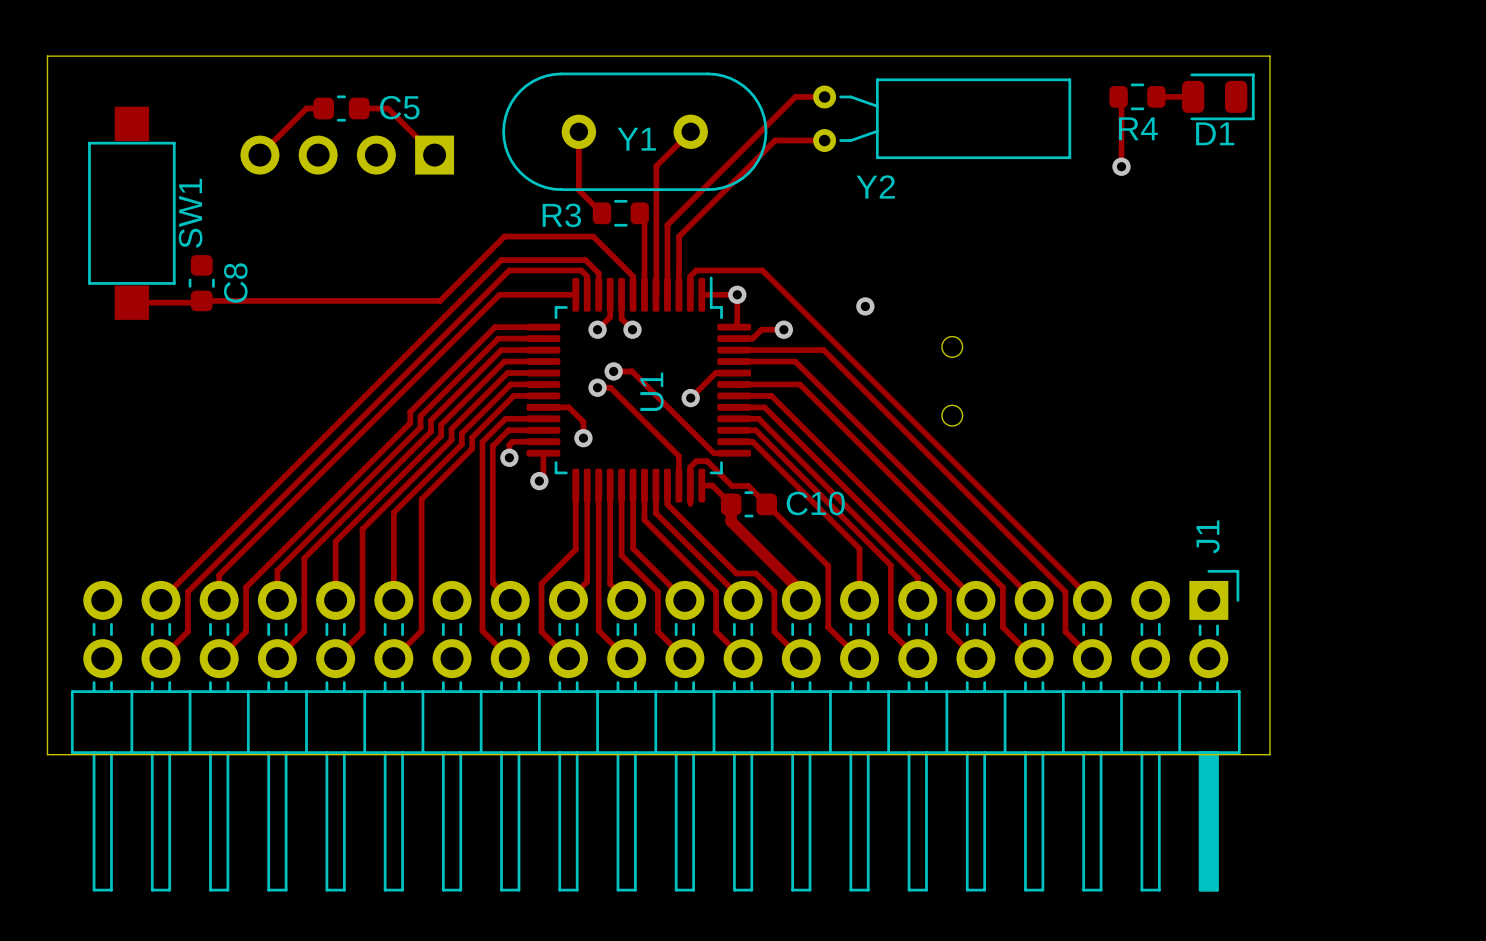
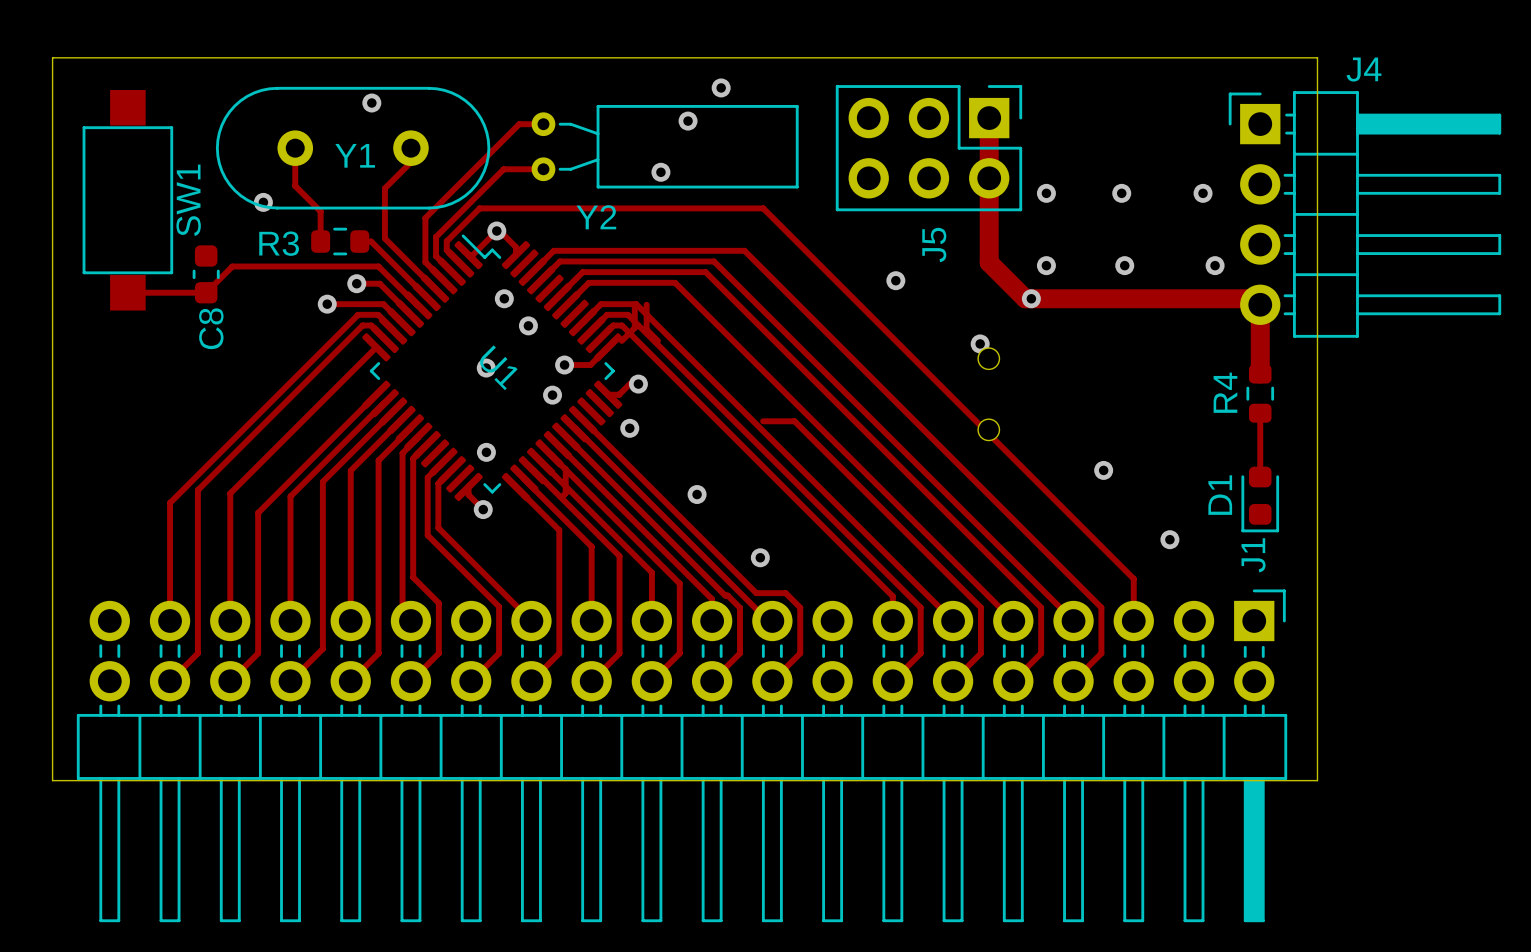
D1 footprint: [1181, 73, 1255, 121] -> [1241, 466, 1280, 533]
via: none -> (721, 87)
track: (824, 96) (795, 96) (667, 224) (667, 294) -> none
track: (1118, 96) (1121, 99) (1121, 166) -> none
R4 rotation: 0° (1137, 96) -> 90° clockwise (1260, 393)
R4 position: (1137, 96) -> (1260, 393)
track: (1156, 96) (1193, 96) -> none
via: none -> (371, 103)
track: (323, 108) (306, 108) (259, 155) -> none
C5: (341, 108) -> none
track: (359, 108) (388, 108) (434, 155) -> none
track: none -> (989, 118) (989, 262) (1025, 298) (1260, 298) (1260, 374)
via: none -> (688, 121)
Y2 position: (942, 118) -> (665, 146)
track: none -> (543, 124) (519, 124) (425, 218) (425, 262) (443, 280)
track: (578, 131) (578, 190) (601, 213) -> none
Y1 position: (634, 131) -> (353, 148)
track: (690, 131) (656, 166) (655, 294) -> none
D1 name position: D1 (1215, 133) -> D1 (1220, 495)
track: (824, 140) (775, 140) (679, 236) (678, 294) -> none
track: none -> (295, 148) (295, 186) (320, 211) (320, 241)
track: none -> (410, 148) (410, 162) (384, 188) (384, 238) (435, 288)
J5: none -> (928, 148)
part: (347, 155) -> none
track: none -> (543, 169) (503, 169) (436, 236) (436, 256) (451, 271)
via: none -> (660, 172)
via: (1121, 166) -> none
via: none -> (1046, 193)
via: none -> (1121, 193)
via: none -> (1203, 193)
via: none -> (263, 202)
J4: none -> (1364, 214)
SW1 position: (131, 213) -> (127, 200)
R3 position: (620, 213) -> (340, 241)
track: (639, 213) (644, 218) (644, 294) -> none
via: none -> (496, 231)
track: none -> (359, 241) (371, 241) (426, 297)
track: none -> (468, 255) (472, 255) (498, 229) (515, 247) (515, 255)
via: none -> (1046, 265)
via: none -> (1124, 265)
via: none -> (1215, 265)
track: none -> (356, 283) (379, 283) (409, 313)
via: none -> (356, 283)
track: none -> (127, 292) (206, 292) (232, 266) (378, 266) (418, 305)
C8 position: (201, 283) -> (206, 274)
C8 name position: C8 (235, 283) -> C8 (211, 328)
via: none -> (504, 298)
via: none -> (1031, 298)
track: none -> (327, 304) (383, 304) (401, 322)
via: none -> (327, 304)
track: (575, 294) (499, 294) (219, 575) -> (376, 347) (230, 493) (230, 594)
track: (587, 294) (587, 276) (581, 270) (509, 270) (187, 591) -> (384, 338) (371, 325) (362, 325) (197, 490) (197, 612)
track: (598, 294) (598, 273) (585, 260) (501, 260) (160, 600) -> (393, 330) (378, 314) (358, 314) (170, 502) (170, 621)
track: (633, 294) (633, 276) (593, 236) (504, 236) (440, 300) (131, 302) -> none
track: (690, 294) (690, 276) (696, 270) (762, 270) (1092, 600) -> (460, 263) (446, 250) (446, 241) (479, 208) (763, 208) (1133, 578) (1133, 621)
track: (701, 294) (737, 294) (737, 324) (734, 327) -> none
via: (737, 294) -> none
via position: (865, 306) -> (895, 280)
via: none -> (528, 325)
track: (543, 327) (495, 327) (410, 411) (410, 423) (246, 587) -> (376, 394) (258, 512) (258, 607)
via: (597, 329) -> none
via: (632, 329) -> none
track: (783, 329) (761, 329) (752, 338) (734, 338) -> none
via: (783, 329) -> none
via: none -> (980, 343)
track: none -> (608, 347) (590, 365) (564, 365)
track: (543, 338) (498, 338) (420, 416) (420, 427) (277, 570) -> (384, 403) (290, 496) (290, 590)
track: (543, 350) (501, 350) (430, 420) (430, 431) (304, 558) (304, 631) -> (393, 411) (322, 481) (322, 648) (318, 653)
track: (734, 350) (823, 350) -> (532, 271) (553, 250) (744, 250) (855, 361)
via: none -> (564, 365)
via: none -> (486, 368)
track: (543, 361) (504, 361) (441, 424) (441, 435) (335, 541) -> (401, 419) (350, 470) (350, 560)
track: (734, 361) (795, 361) -> (541, 280) (559, 261) (714, 261) (826, 373)
track: none -> (630, 383) (619, 394) (608, 394)
track: (613, 371) (632, 371) (713, 453) (734, 453) -> none
track: (543, 373) (507, 373) (451, 429) (451, 440) (362, 529) -> (409, 428) (378, 460) (378, 547)
track: (734, 373) (715, 373) (690, 398) -> none
via: none -> (552, 395)
track: (543, 384) (510, 384) (461, 433) (461, 444) (393, 512) (393, 600) -> (418, 436) (402, 453) (402, 612) (410, 621)
track: (734, 384) (799, 384) -> (557, 297) (582, 272) (705, 272) (831, 397)
track: (597, 387) (610, 387) (678, 456) (678, 485) -> none
via: (597, 387) -> none
U1 rotation: 0° (638, 389) -> 45° counterclockwise (492, 367)
U1 position: (638, 389) -> (492, 367)
track: (543, 395) (513, 395) (472, 437) (472, 448) (421, 499) (420, 631) -> (426, 445) (413, 458) (413, 577) (438, 603) (438, 653)
track: (734, 395) (771, 395) -> (566, 305) (588, 282) (675, 282) (801, 409)
via: (690, 398) -> none
track: none -> (1260, 413) (1260, 473)
track: (543, 407) (568, 407) (583, 421) (583, 438) -> none
via: none -> (629, 428)
track: (543, 418) (505, 418) (482, 441) (482, 630) (510, 658) -> (515, 486) (559, 530) (559, 653) (531, 681)
track: (734, 418) (758, 418) (917, 577) (917, 600) -> (583, 322) (601, 304) (636, 304) (953, 621)
track: (543, 430) (508, 430) (492, 446) (492, 582) -> (451, 470) (438, 483) (438, 527) (513, 602)
track: (734, 430) (755, 430) (890, 565) (890, 631) (917, 658) -> none
via: none -> (486, 452)
via: (583, 438) -> none
track: (543, 441) (512, 441) (509, 444) (509, 457) -> none
track: (734, 441) (752, 441) (859, 548) (859, 576) -> (599, 338) (613, 325) (621, 325) (892, 596)
track: none -> (443, 461) (427, 477) (427, 535) (499, 606) (499, 653) (471, 681)
via: none -> (1103, 470)
via: (509, 457) -> none
track: none -> (468, 486) (468, 494) (483, 509)
via: none -> (697, 494)
via: (539, 481) -> none
track: (575, 485) (575, 549) (541, 583) (541, 631) (568, 658) -> (532, 470) (619, 556) (619, 653) (591, 681)
track: (587, 485) (587, 581) (568, 600) -> (524, 478) (591, 546) (591, 621)
track: (598, 485) (598, 630) (626, 658) -> (549, 453) (679, 583) (679, 653) (651, 681)
track: (610, 485) (610, 583) (626, 600) -> (541, 461) (651, 572) (651, 621)
track: (621, 485) (621, 555) (657, 591) (657, 631) (684, 658) -> (566, 436) (725, 595) (727, 595) (740, 607) (740, 653) (712, 681)
track: (633, 485) (633, 548) (684, 600) -> (557, 445) (712, 599) (712, 621)
track: (644, 485) (644, 520) (716, 591) (716, 631) (743, 658) -> none
track: (655, 485) (655, 513) (743, 600) -> (574, 428) (768, 621) (772, 621)
track: (667, 485) (667, 504) (736, 573) -> (583, 419) (756, 593) (765, 593)
track: (701, 485) (712, 485) (731, 504) (731, 521) (801, 591) (801, 600) -> none
via: none -> (483, 509)
track: (690, 504) (690, 467) (696, 461) (707, 461) (732, 486) (748, 486) (828, 565) (828, 627) (859, 658) -> (591, 330) (607, 314) (627, 314) (920, 607) (920, 653) (892, 681)
C10: (748, 504) -> none
via: none -> (1169, 539)
via: none -> (760, 557)
track: (770, 587) (774, 591) (774, 631) (801, 658) -> (800, 607) (800, 653) (772, 681)
track: (944, 587) (949, 591) (949, 631) (975, 658) -> (980, 607) (980, 653) (953, 681)
track: (1061, 587) (1065, 591) (1065, 631) (1092, 658) -> (1101, 607) (1101, 653) (1073, 681)
track: (1002, 627) (1034, 658) -> (1041, 648) (1041, 653) (1013, 681)

